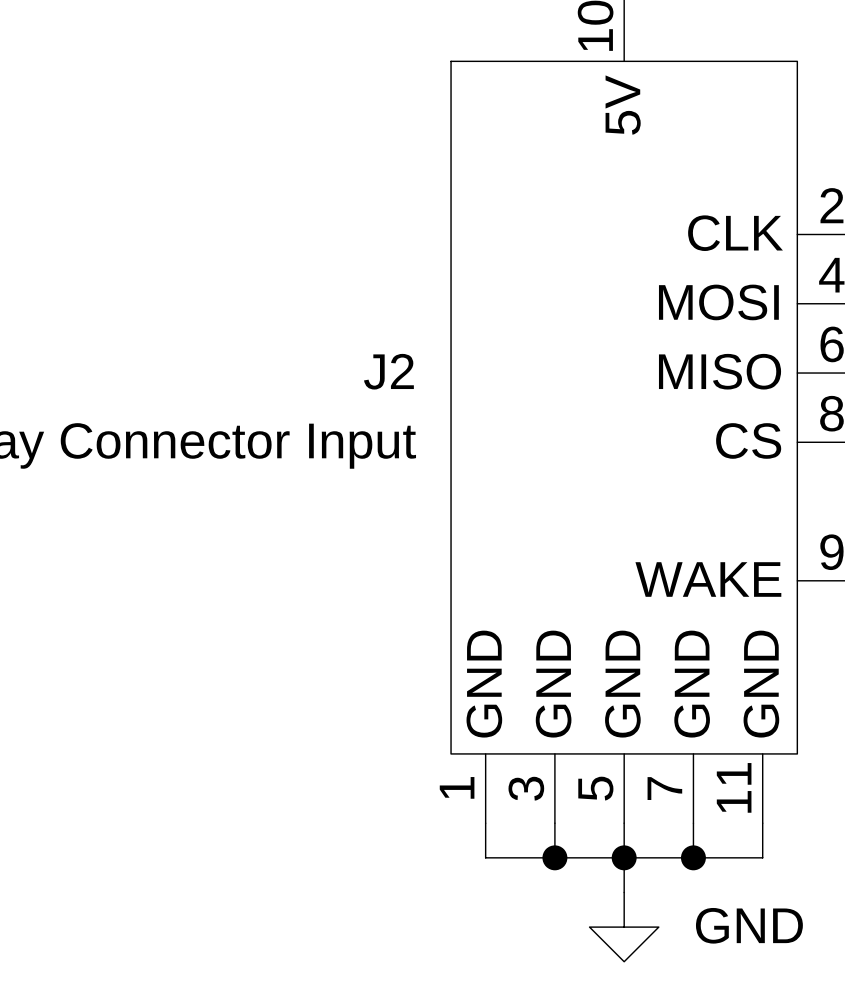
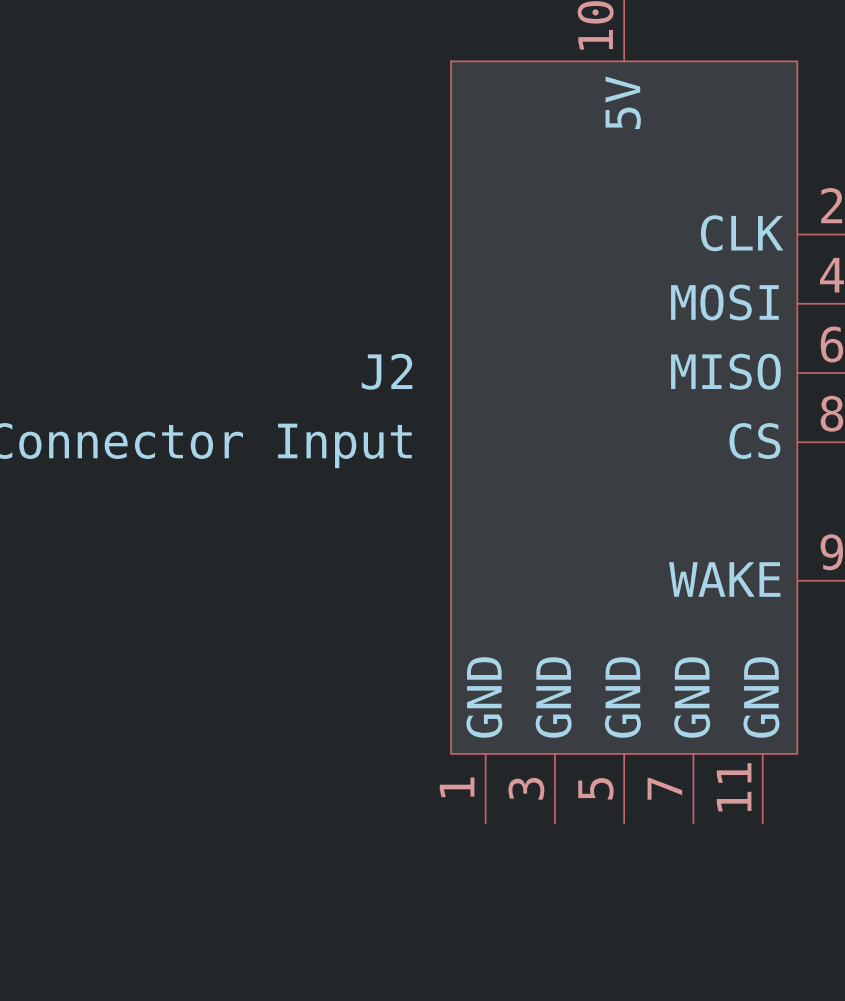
wire: (485, 823) (485, 857) (762, 857) (762, 823) -> none
wire: (554, 823) (554, 857) -> none
wire: (624, 823) (624, 892) -> none
wire: (693, 823) (693, 857) -> none
junction: (554, 857) -> none
junction: (624, 857) -> none
junction: (693, 857) -> none
power symbol: GND (624, 927) -> none

